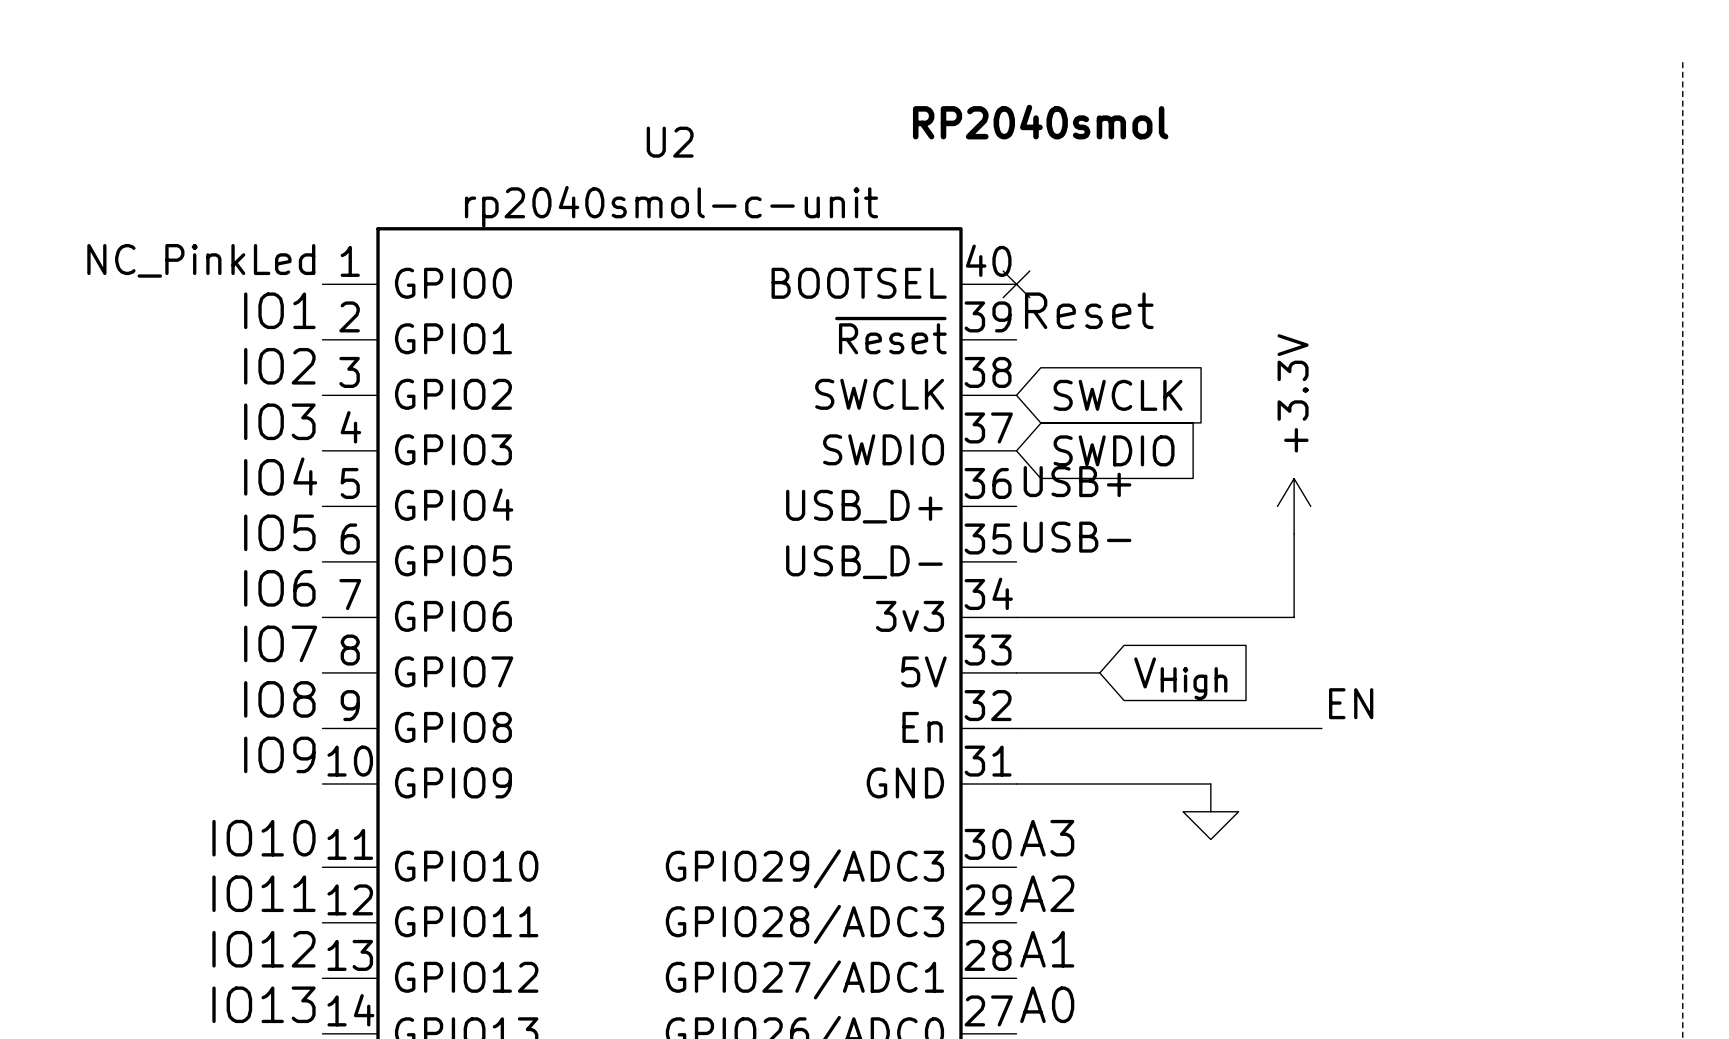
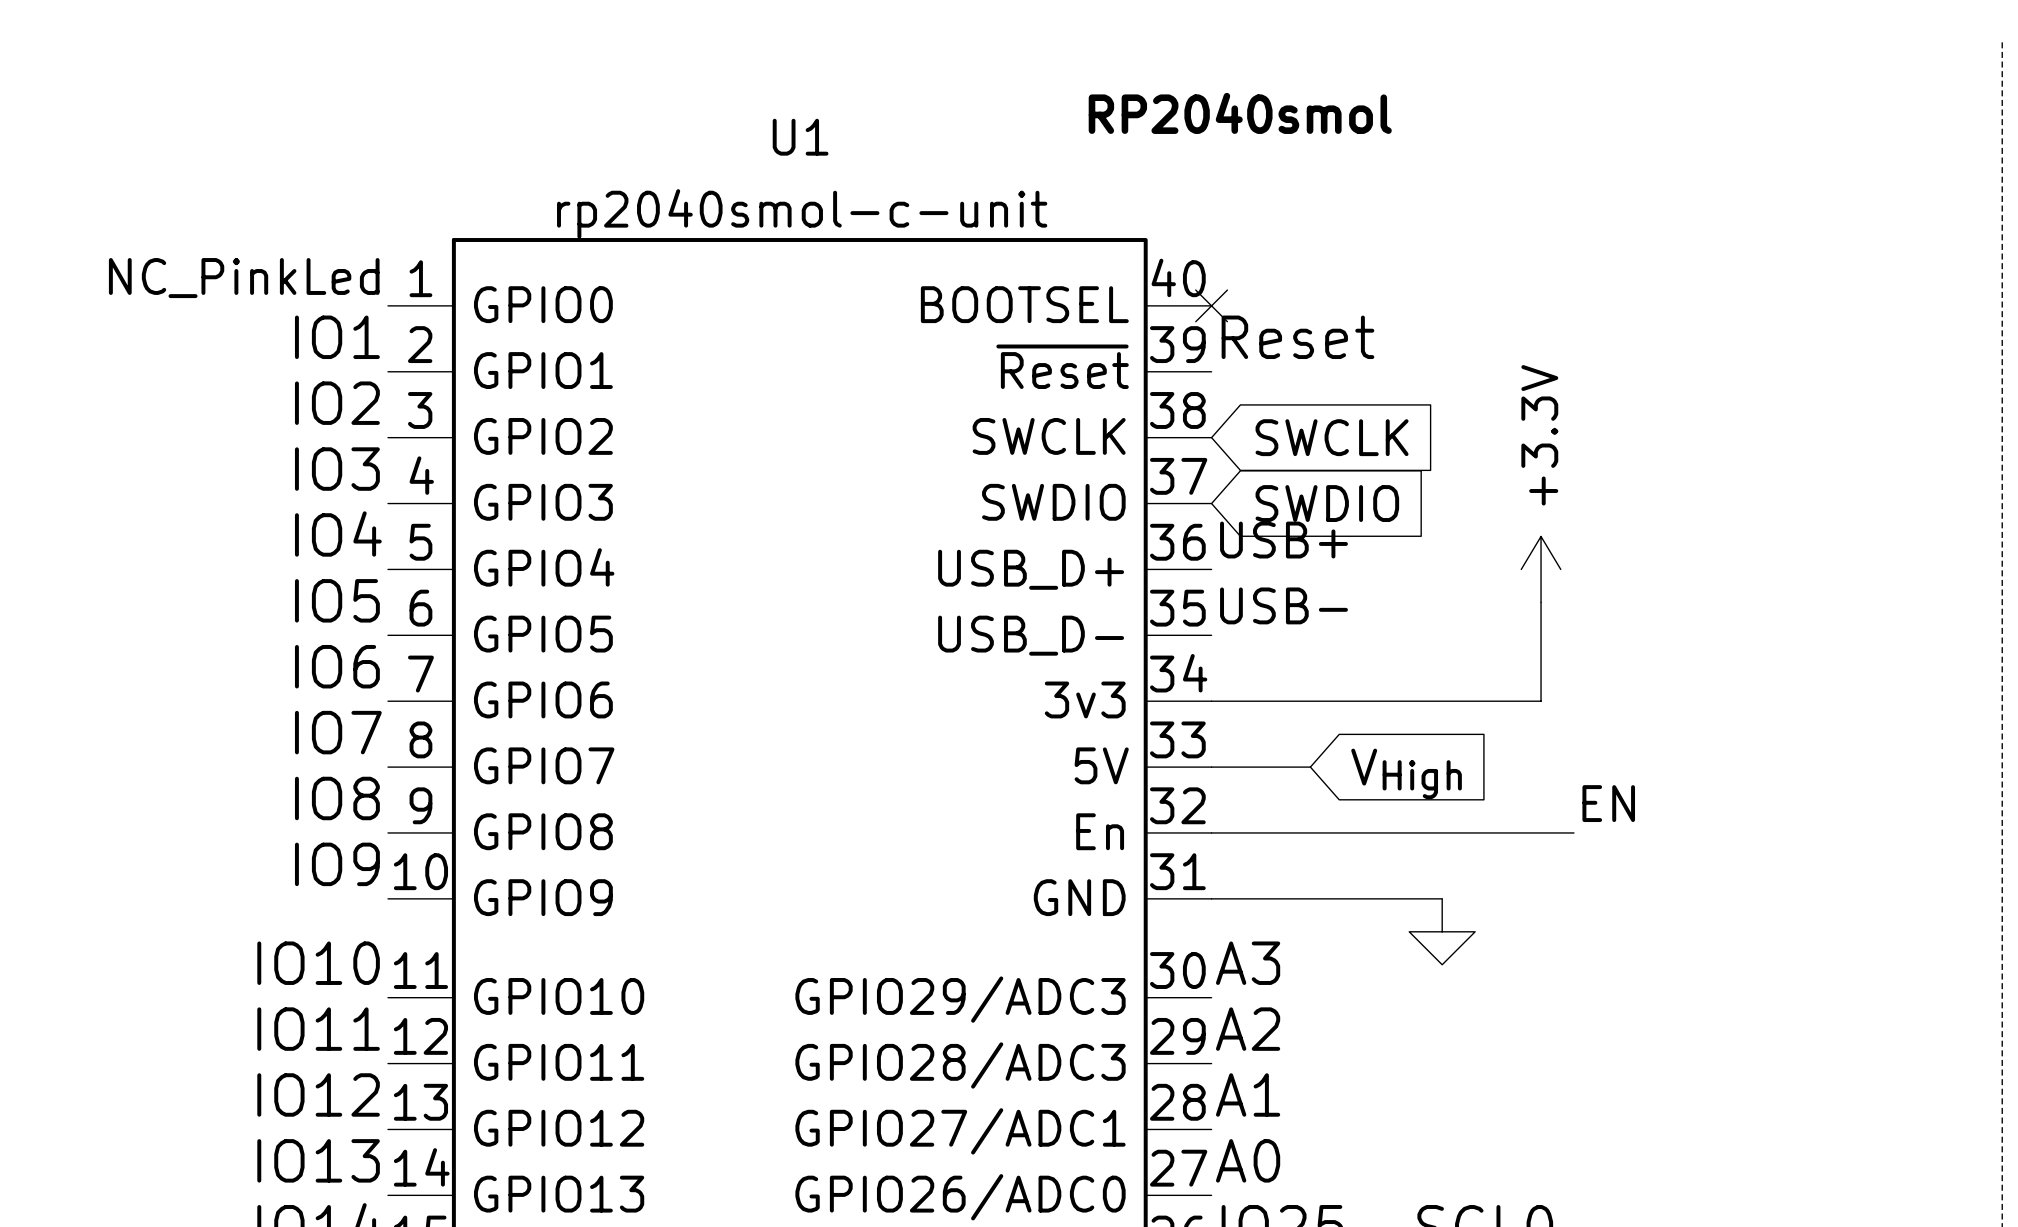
U2 name: U2 (670, 142) -> U1 (800, 137)

